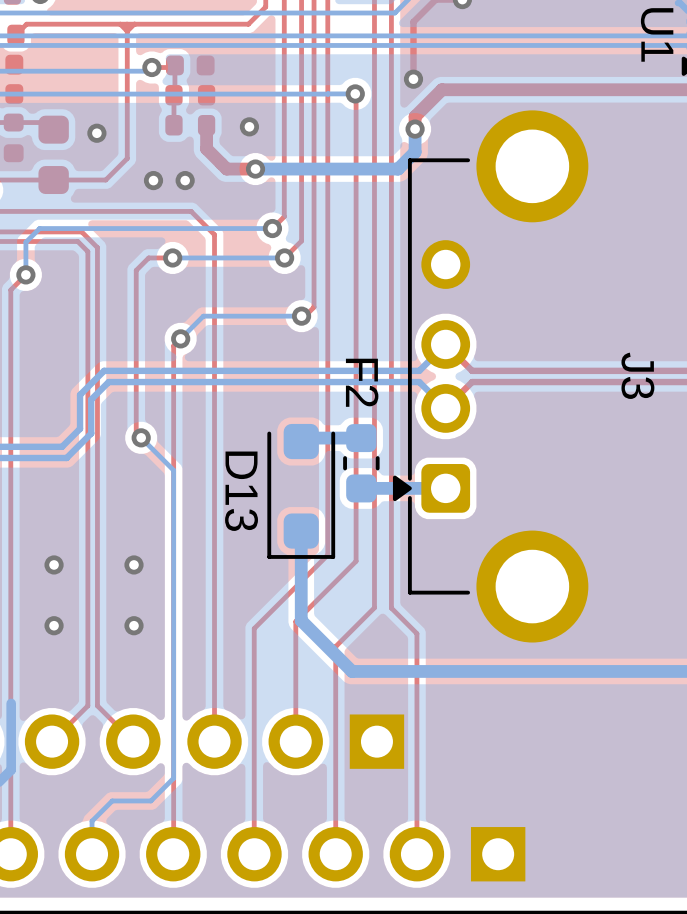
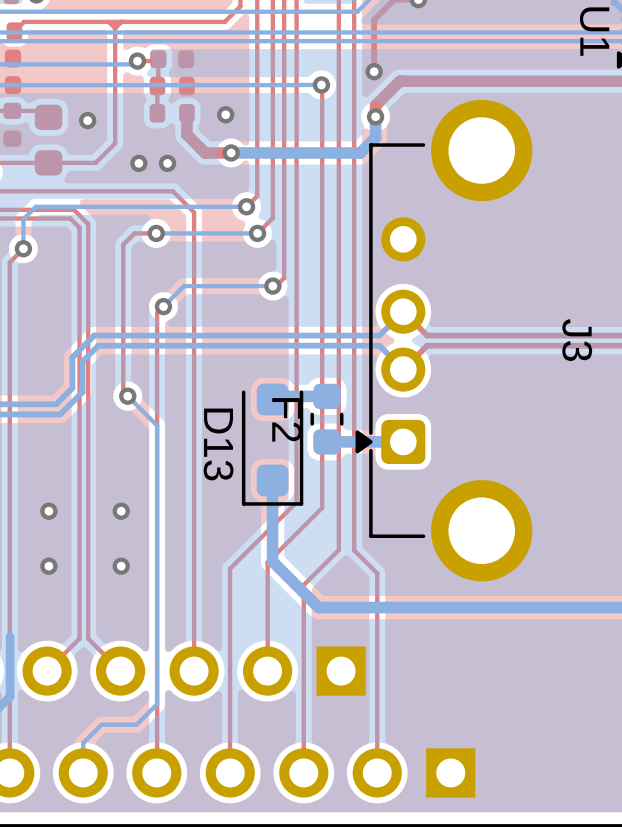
F2 name position: F2 (362, 382) -> F2 (286, 419)

